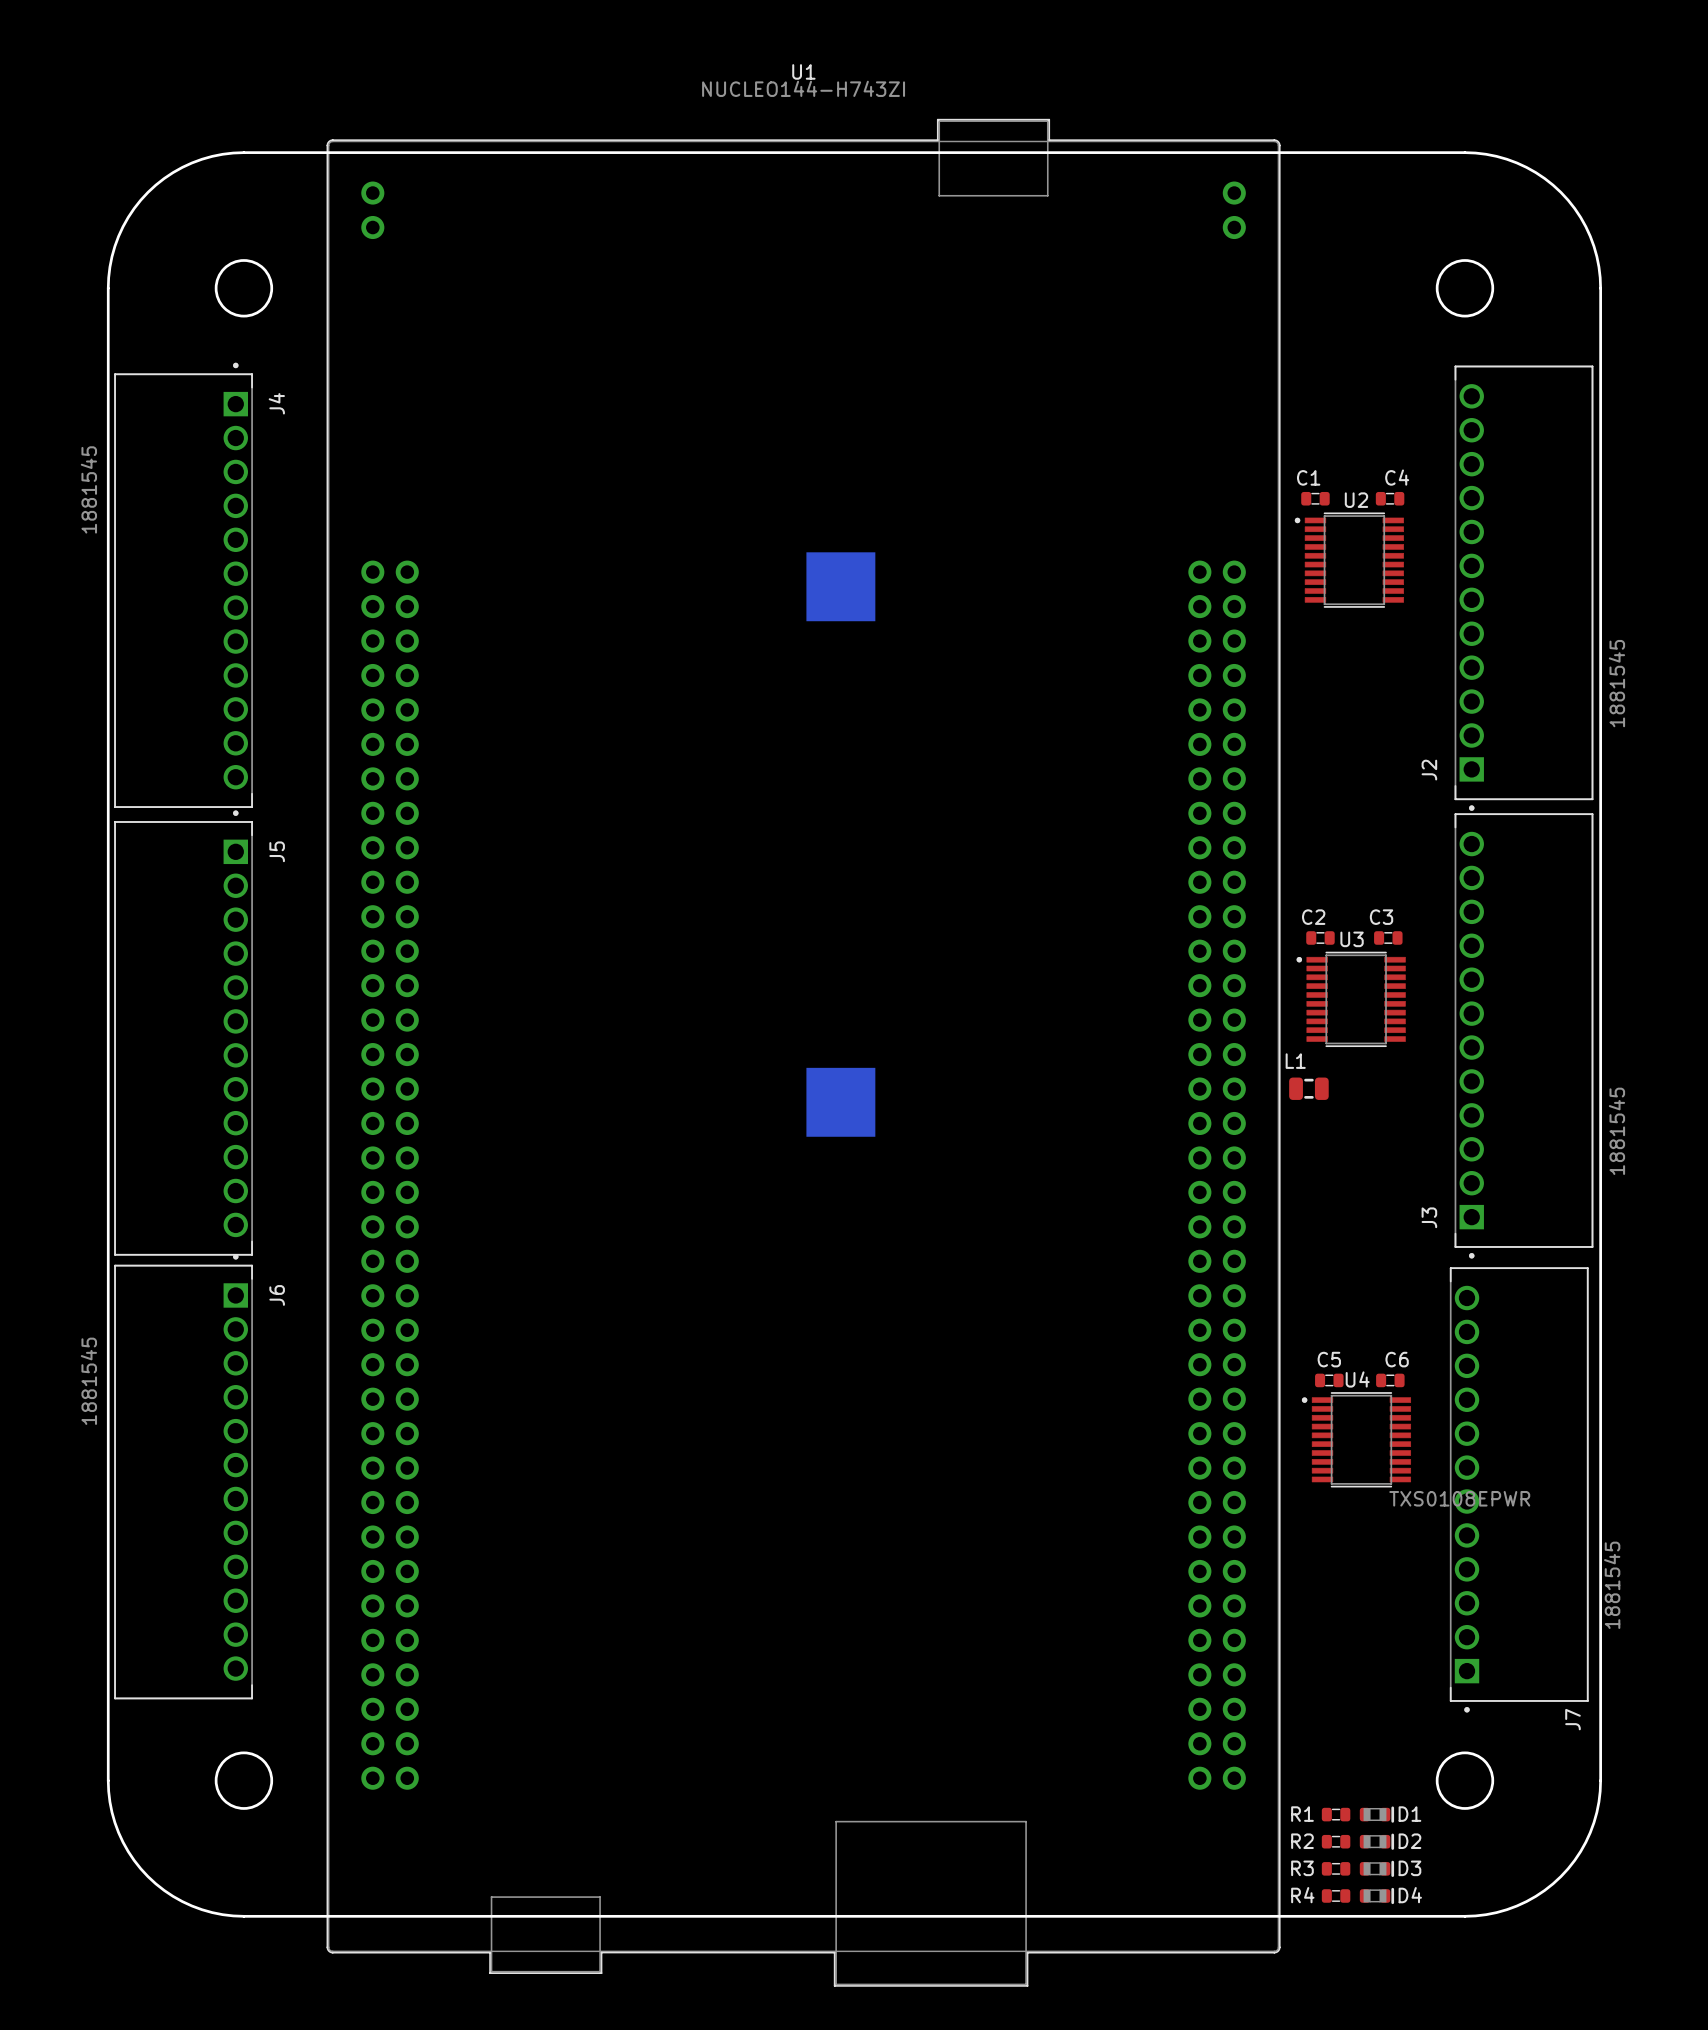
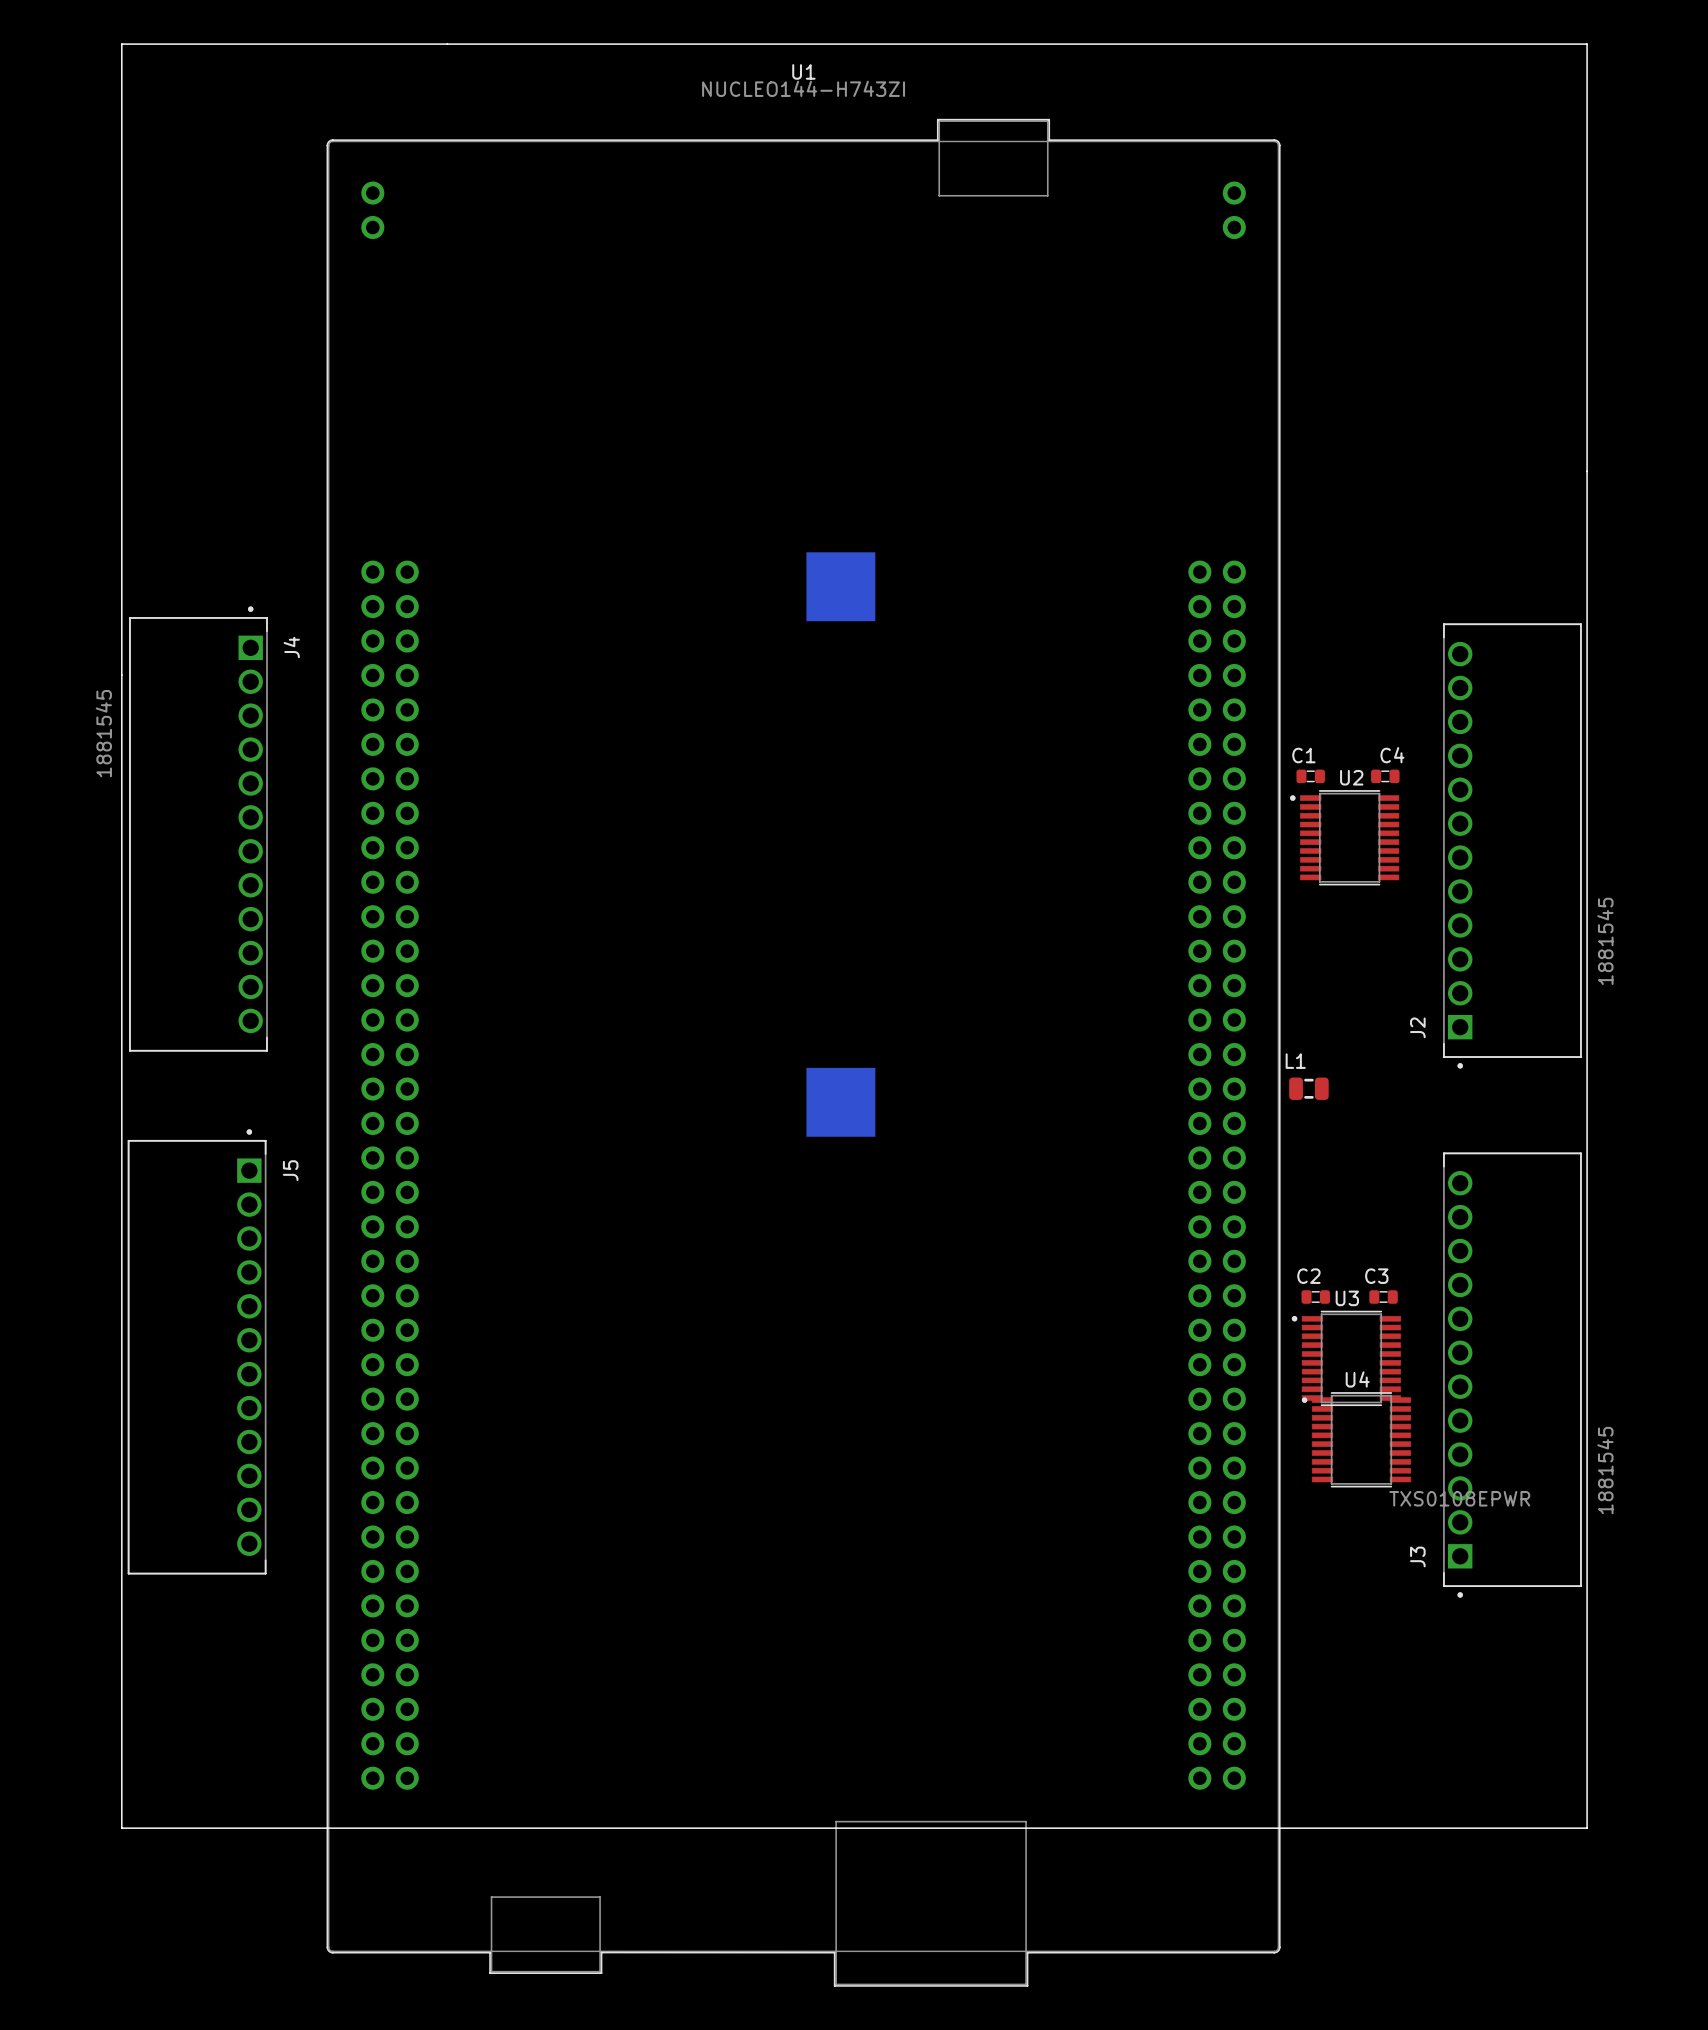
board edge: (243, 152) (1475, 153) (1506, 159) (1535, 172) (1553, 185) (1574, 208) (1585, 226) (1593, 246) (1598, 267) (1600, 288) (1600, 1780) (1596, 1812) (1585, 1842) (1568, 1868) (1544, 1890) (1526, 1901) (1506, 1909) (1486, 1914) (1464, 1916) (243, 1916) (212, 1912) (182, 1901) (155, 1883) (134, 1860) (123, 1842) (114, 1822) (109, 1801) (108, 1780) (108, 277) (112, 256) (123, 226) (134, 208) (155, 185) (182, 167) (202, 159) (222, 154) (243, 152) -> (121, 44) (121, 1828) (1587, 1828) (1587, 44) (121, 44)
round board edge: [214, 259, 274, 318] -> none
round board edge: [1435, 259, 1495, 318] -> none
C1 position: (1315, 498) -> (1310, 776)
C4 position: (1390, 498) -> (1385, 776)
U2 position: (1349, 560) -> (1344, 837)
J4 position: (183, 585) -> (198, 829)
J2 position: (1523, 588) -> (1512, 845)
C2 position: (1320, 937) -> (1315, 1297)
C3 position: (1388, 937) -> (1383, 1297)
U3 position: (1351, 999) -> (1346, 1358)
J5 position: (183, 1033) -> (197, 1351)
J3 position: (1523, 1035) -> (1512, 1375)
C5: (1329, 1380) -> none
C6: (1390, 1380) -> none
J6: 1881545 (183, 1476) -> none
J7: 1881545 (1519, 1489) -> none
round board edge: [214, 1751, 274, 1810] -> none
round board edge: [1435, 1751, 1495, 1810] -> none
R1: (1336, 1814) -> none
D1: (1376, 1814) -> none
R2: (1336, 1841) -> none
D2: (1376, 1841) -> none
R3: (1336, 1868) -> none
D3: (1376, 1868) -> none
R4: (1336, 1895) -> none
D4: (1376, 1895) -> none

